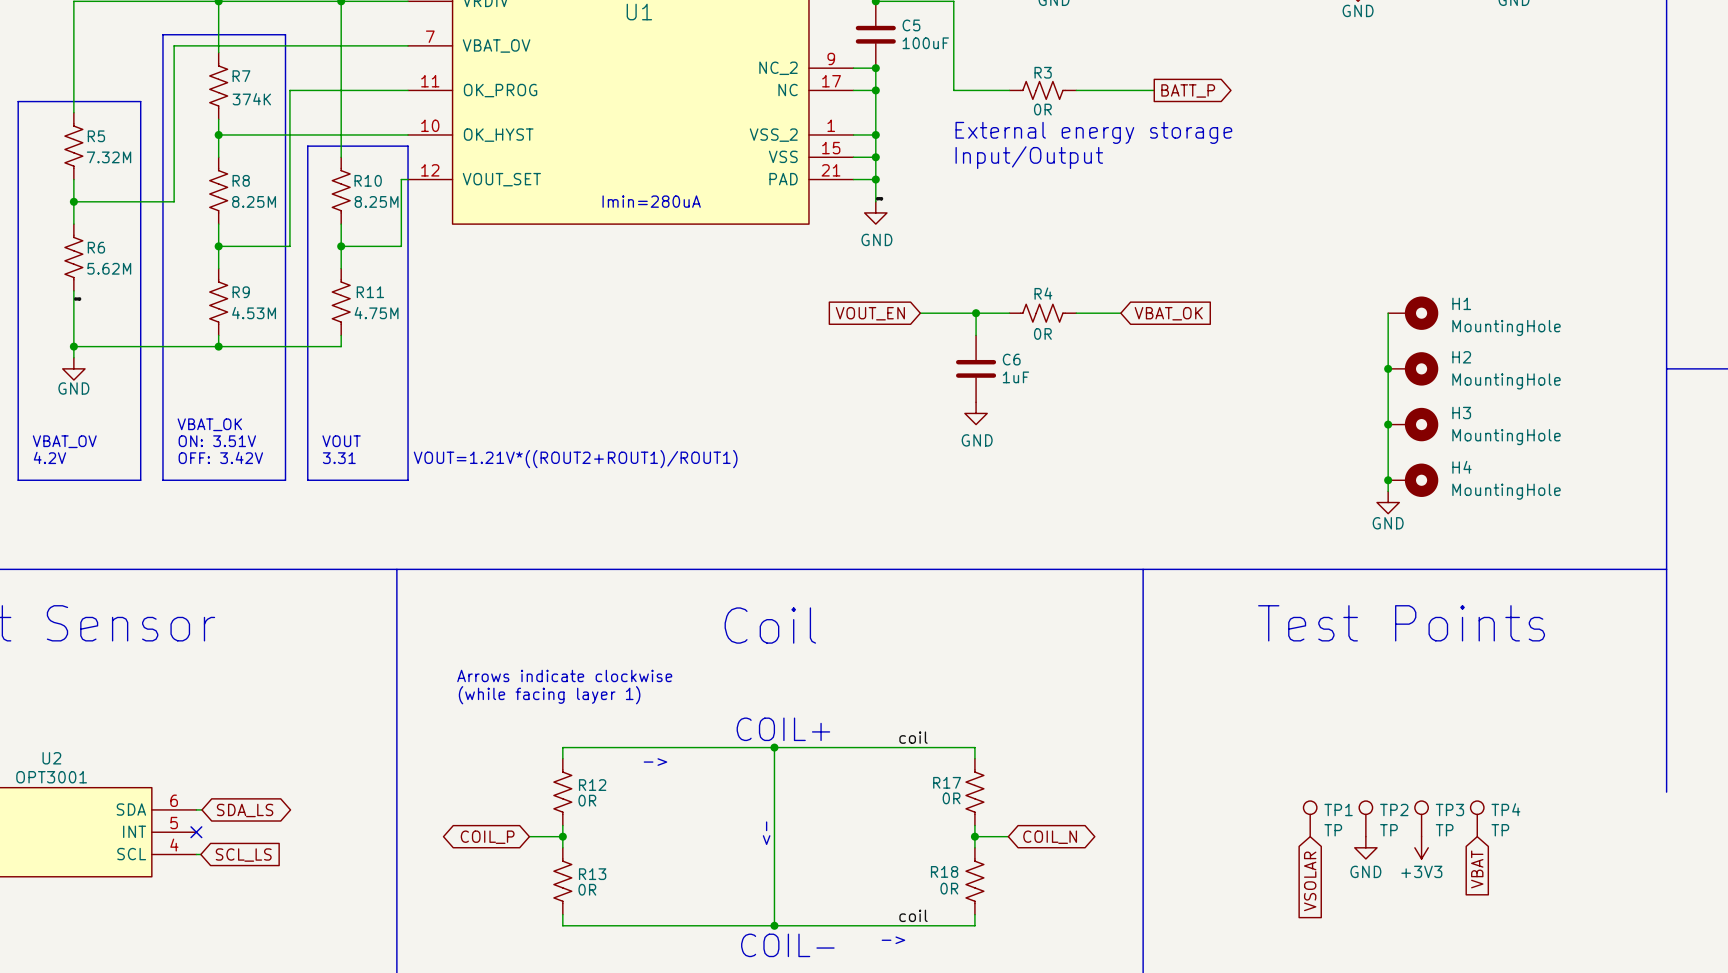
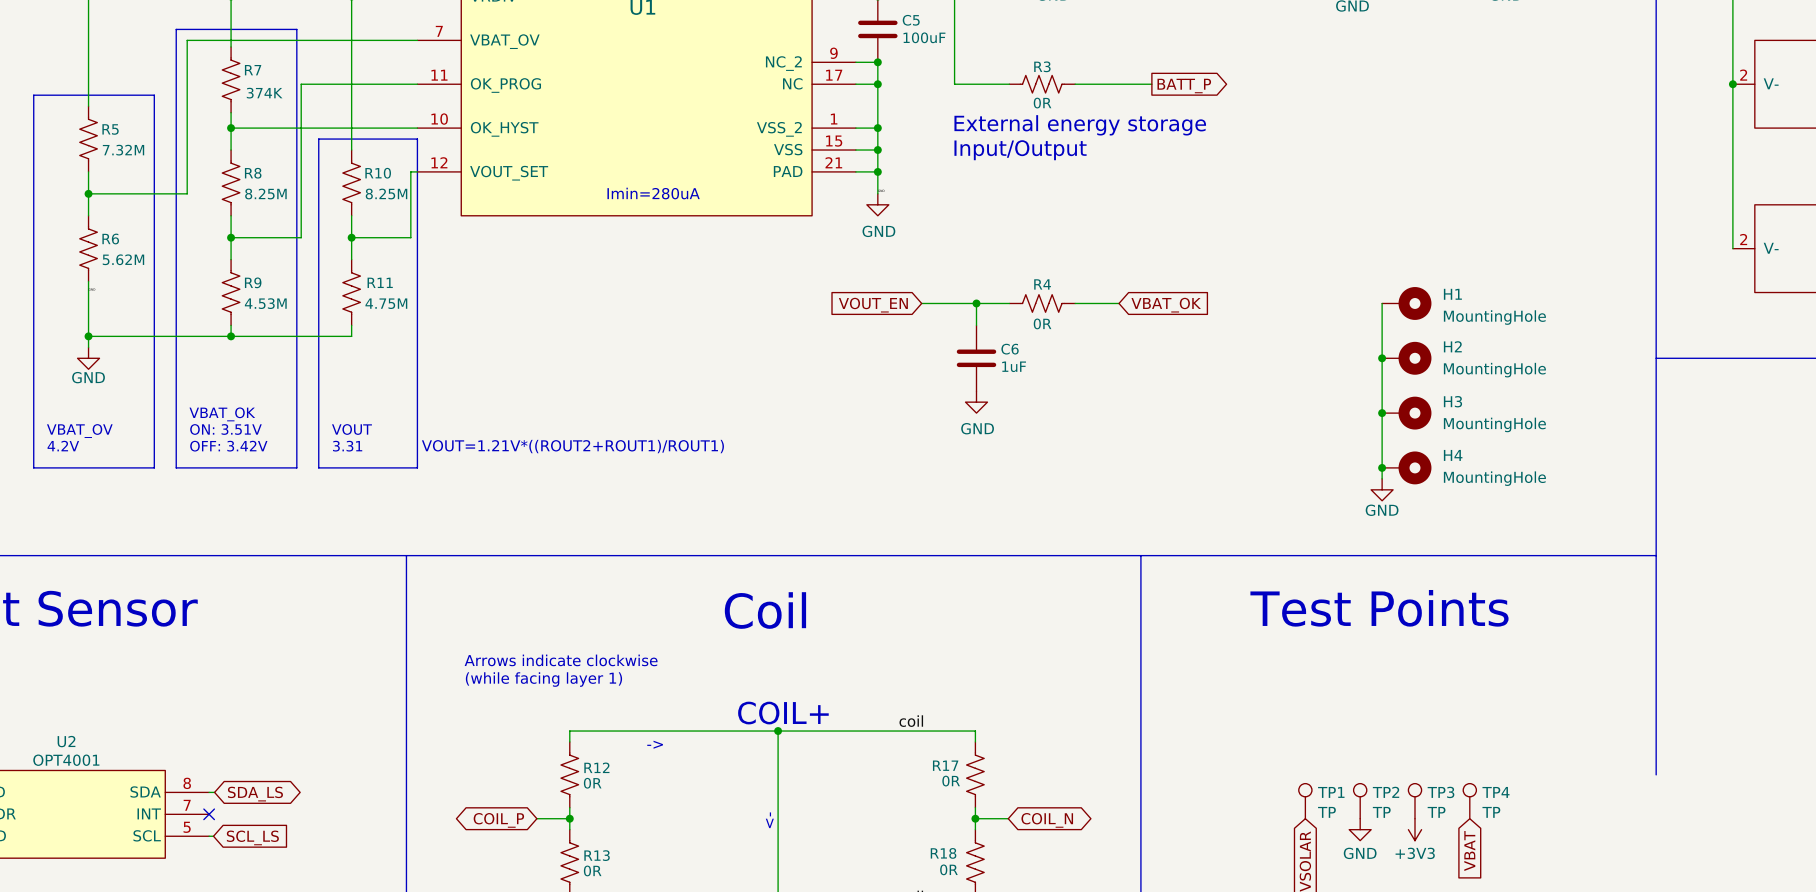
U2 value: OPT3001 (51, 777) -> OPT4001 (66, 760)
U2 pin number: 6 (174, 800) -> 8 (187, 783)
U2 pin number: 5 (174, 823) -> 7 (187, 805)
U2 pin number: 4 (174, 845) -> 5 (187, 827)

